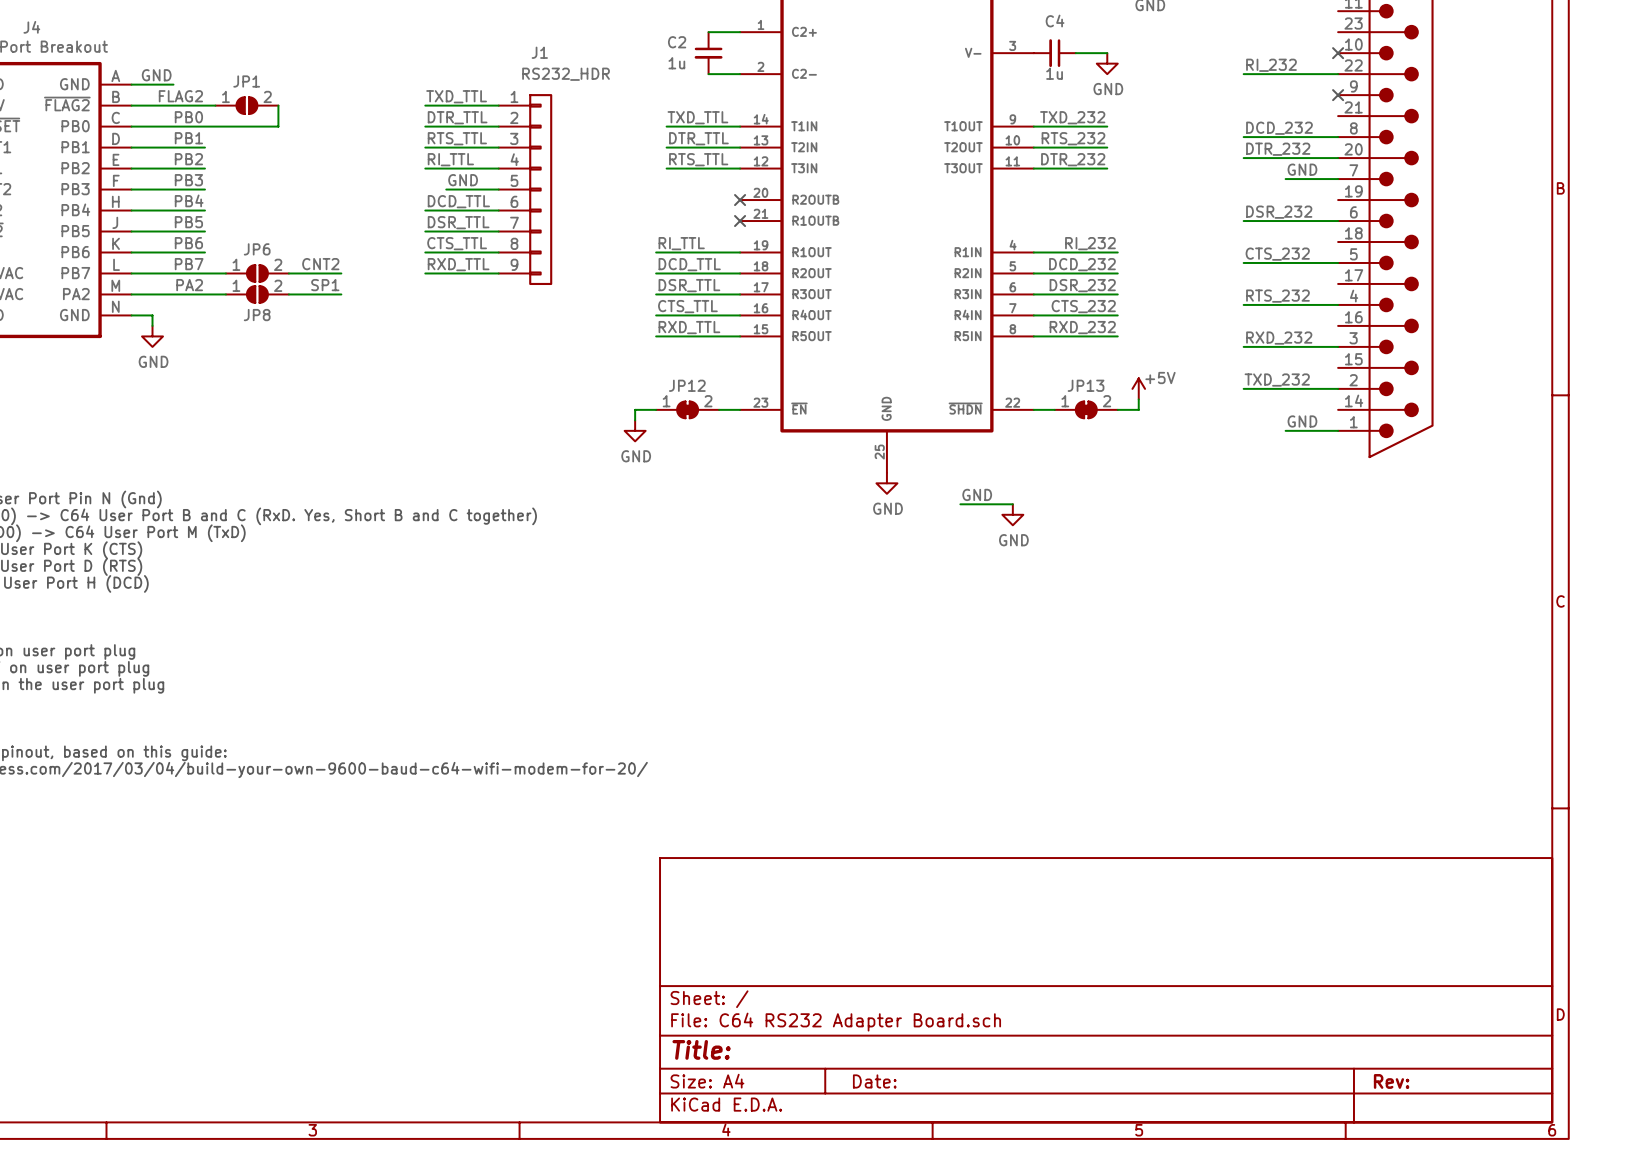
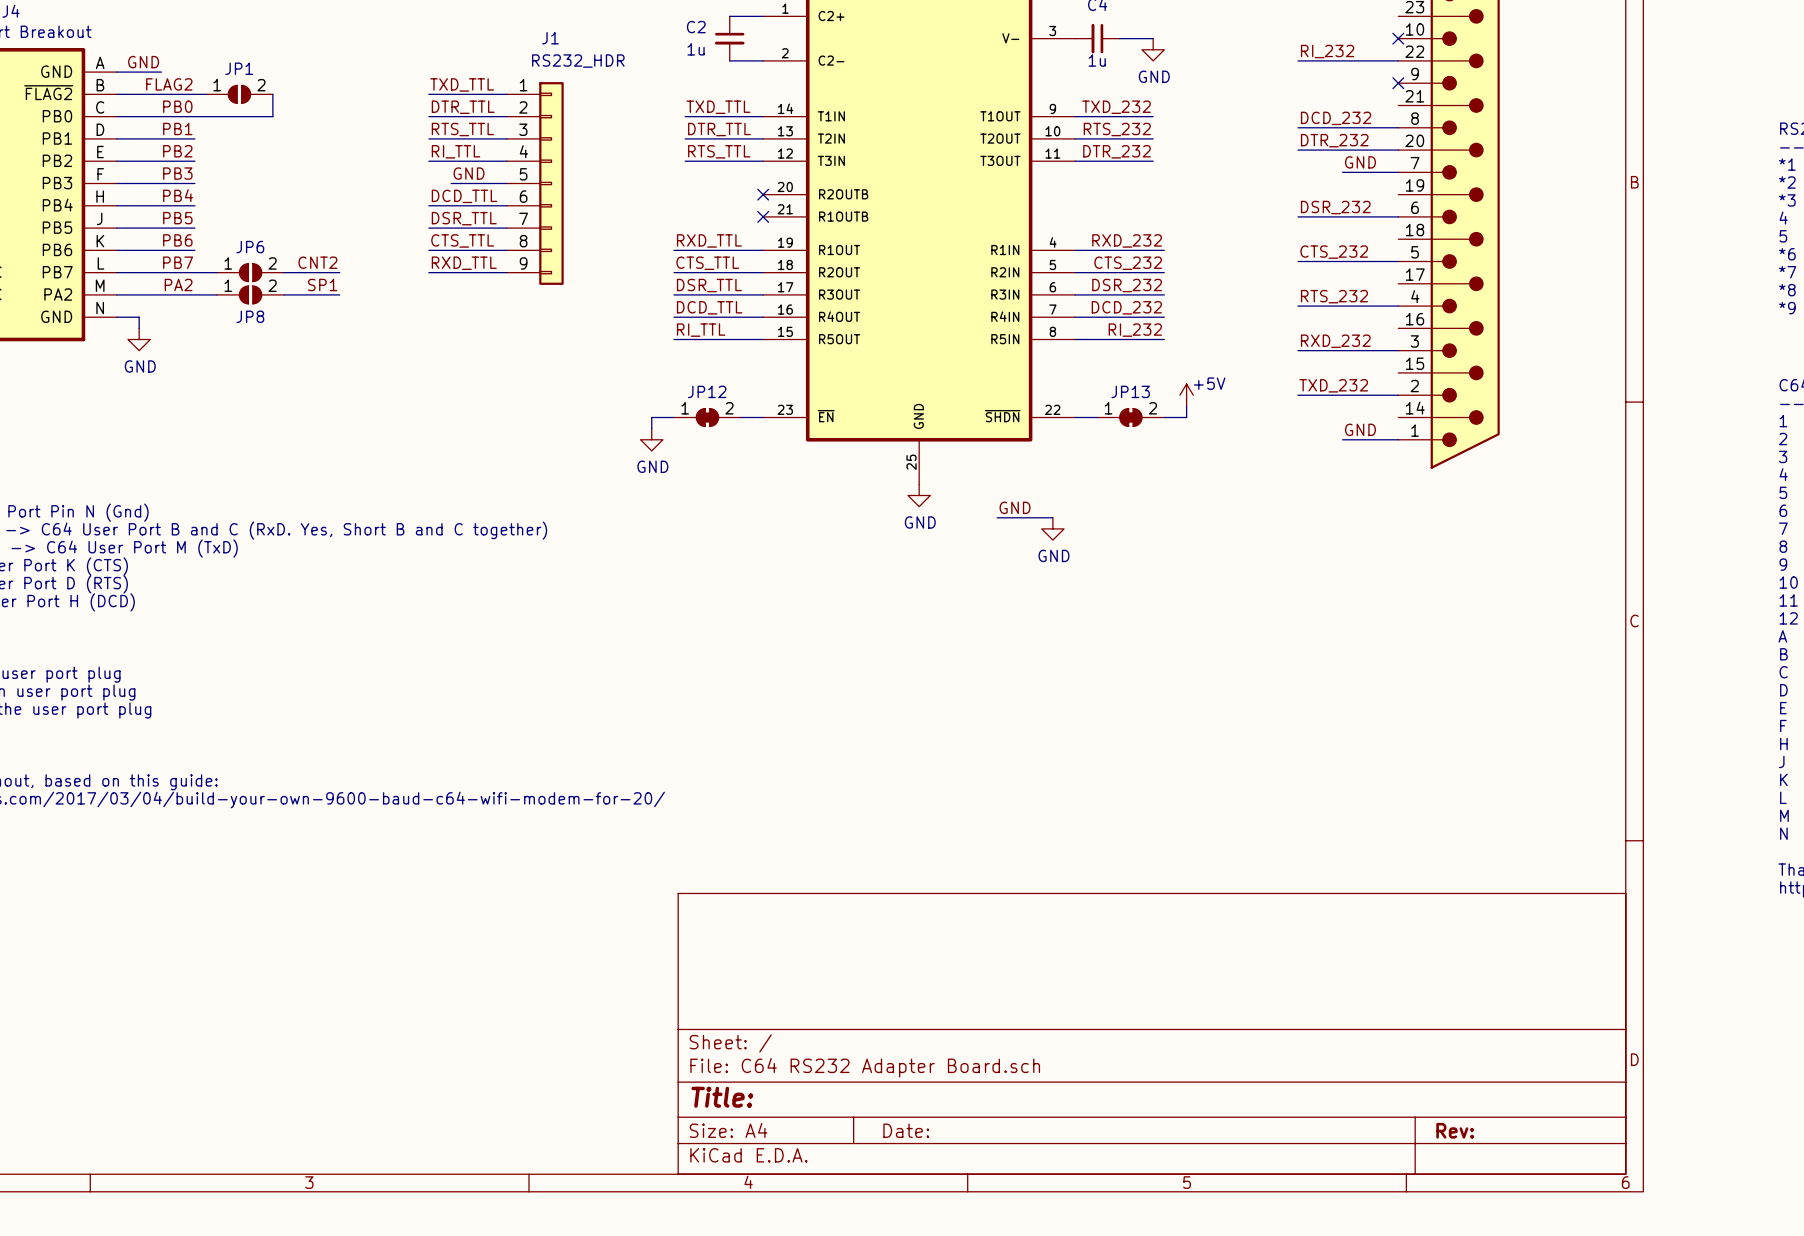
label: RI_TTL (681, 243) -> RXD_TTL (709, 240)
label: RI_232 (1090, 243) -> RXD_232 (1127, 240)
label: DCD_TTL (689, 264) -> CTS_TTL (707, 263)
label: DCD_232 (1082, 264) -> CTS_232 (1128, 263)
label: CTS_TTL (687, 306) -> DCD_TTL (709, 307)
label: CTS_232 (1083, 306) -> DCD_232 (1126, 307)
label: RXD_TTL (689, 327) -> RI_TTL (701, 330)
label: RXD_232 (1082, 327) -> RI_232 (1135, 330)

